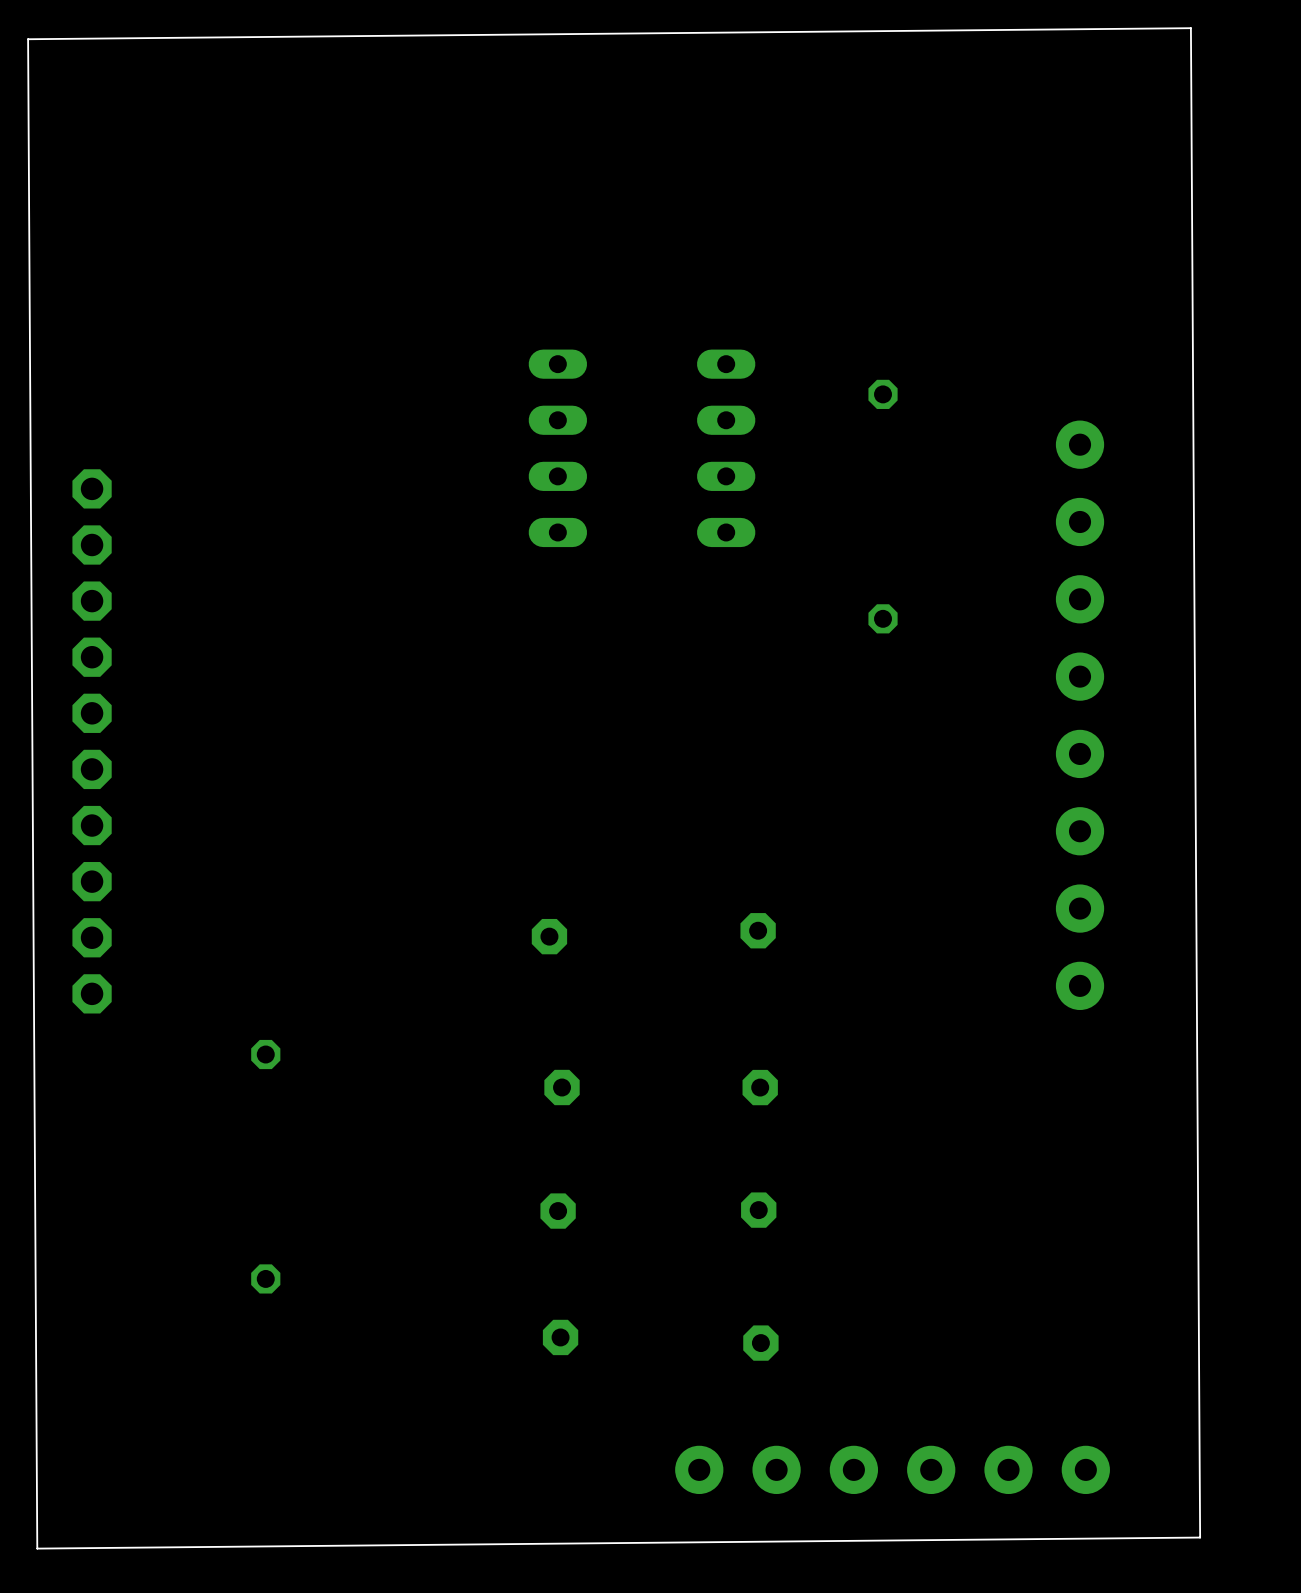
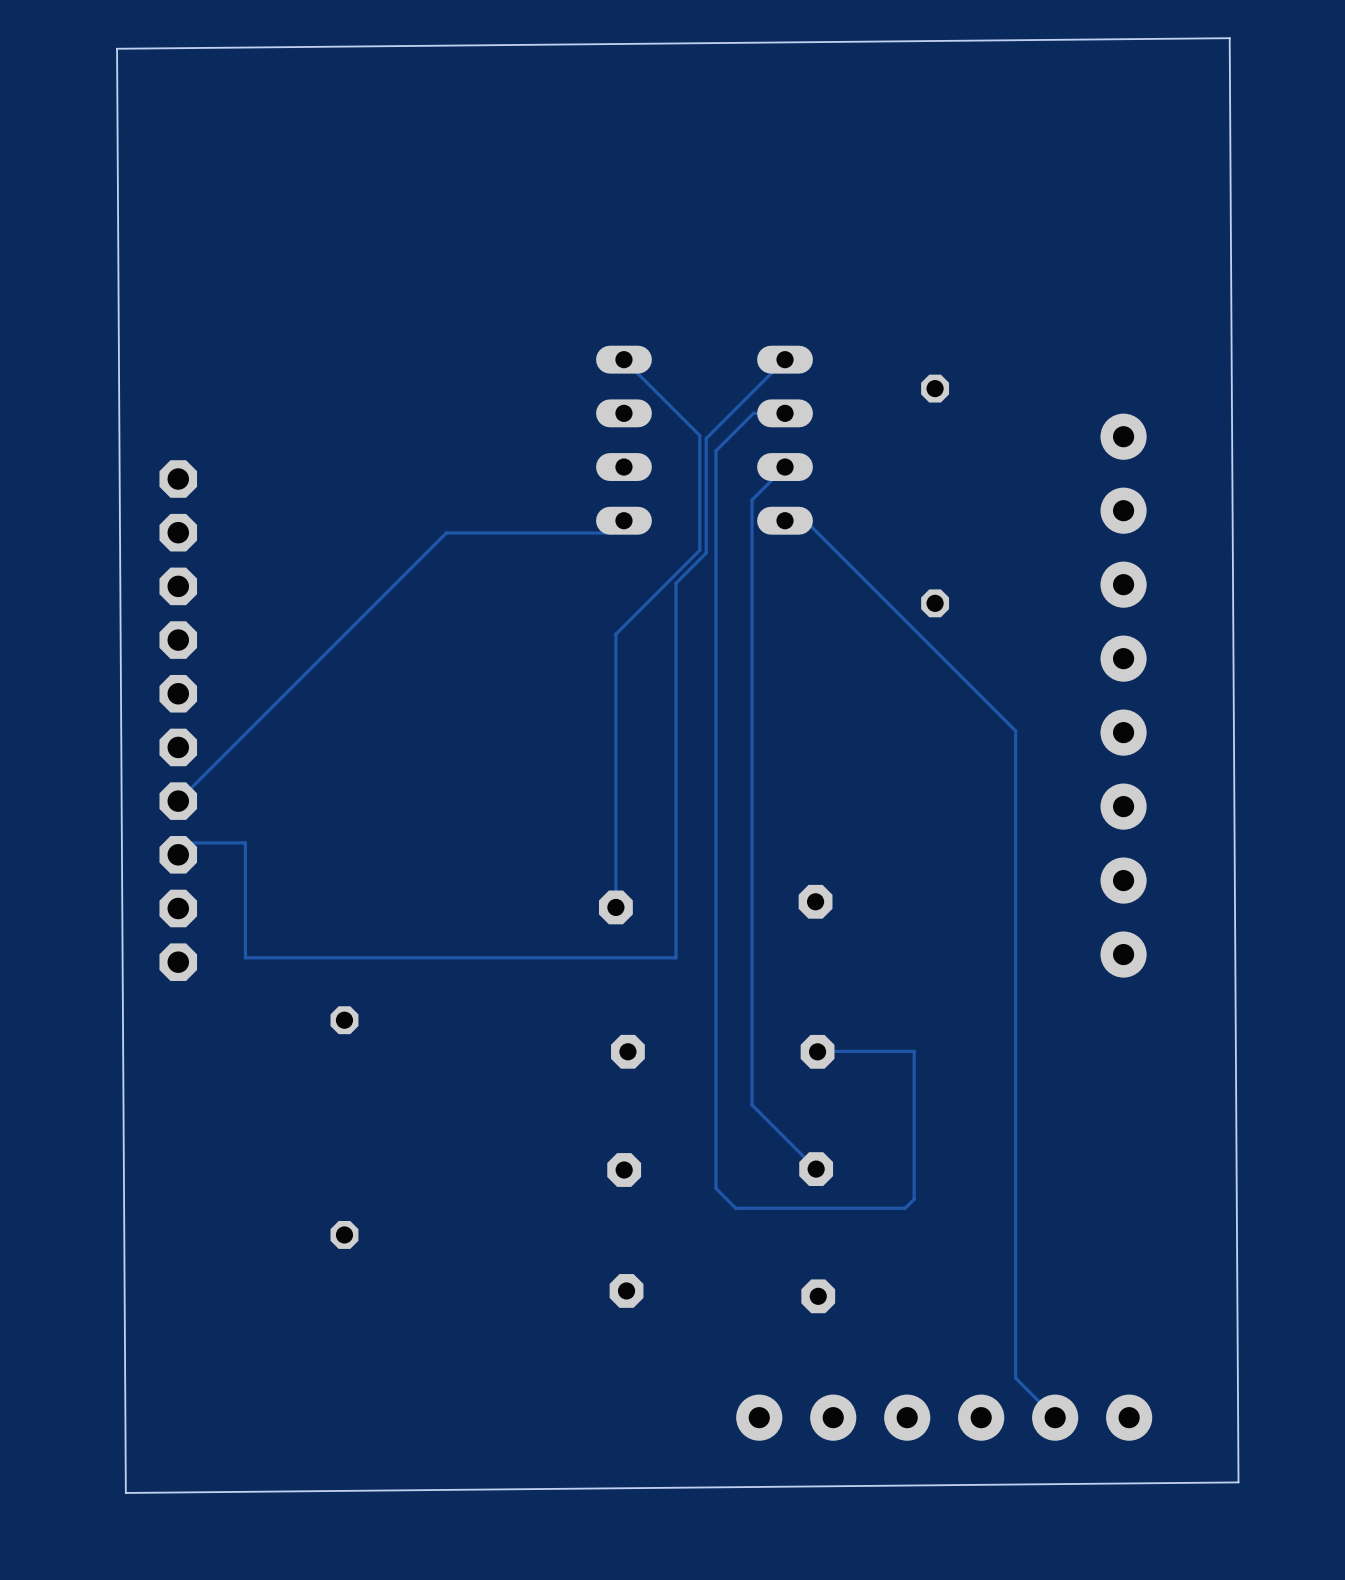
track: none -> (623, 359) (699, 435) (699, 550) (615, 634) (615, 907)
track: none -> (785, 359) (706, 438) (706, 553) (675, 583) (675, 957) (245, 957) (245, 842) (190, 842) (178, 854)
track: none -> (785, 413) (753, 413) (715, 450) (715, 1188) (735, 1208) (905, 1208) (914, 1199) (914, 1051) (817, 1051)
track: none -> (785, 467) (752, 500) (752, 1104) (816, 1169)
track: none -> (623, 520) (611, 533) (446, 533) (178, 801)
track: none -> (785, 520) (805, 520) (1015, 730) (1015, 1378) (1055, 1417)

